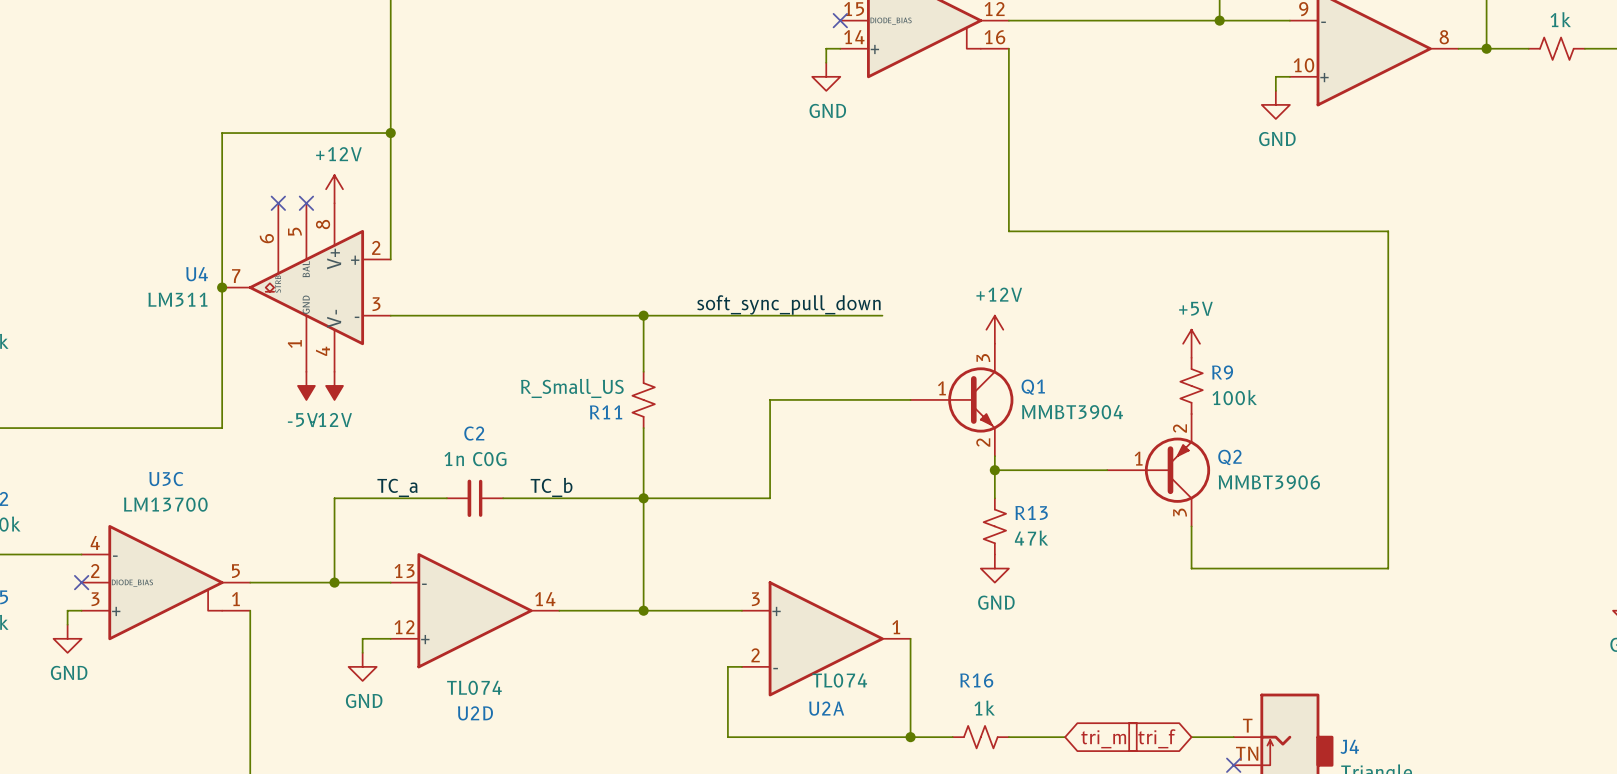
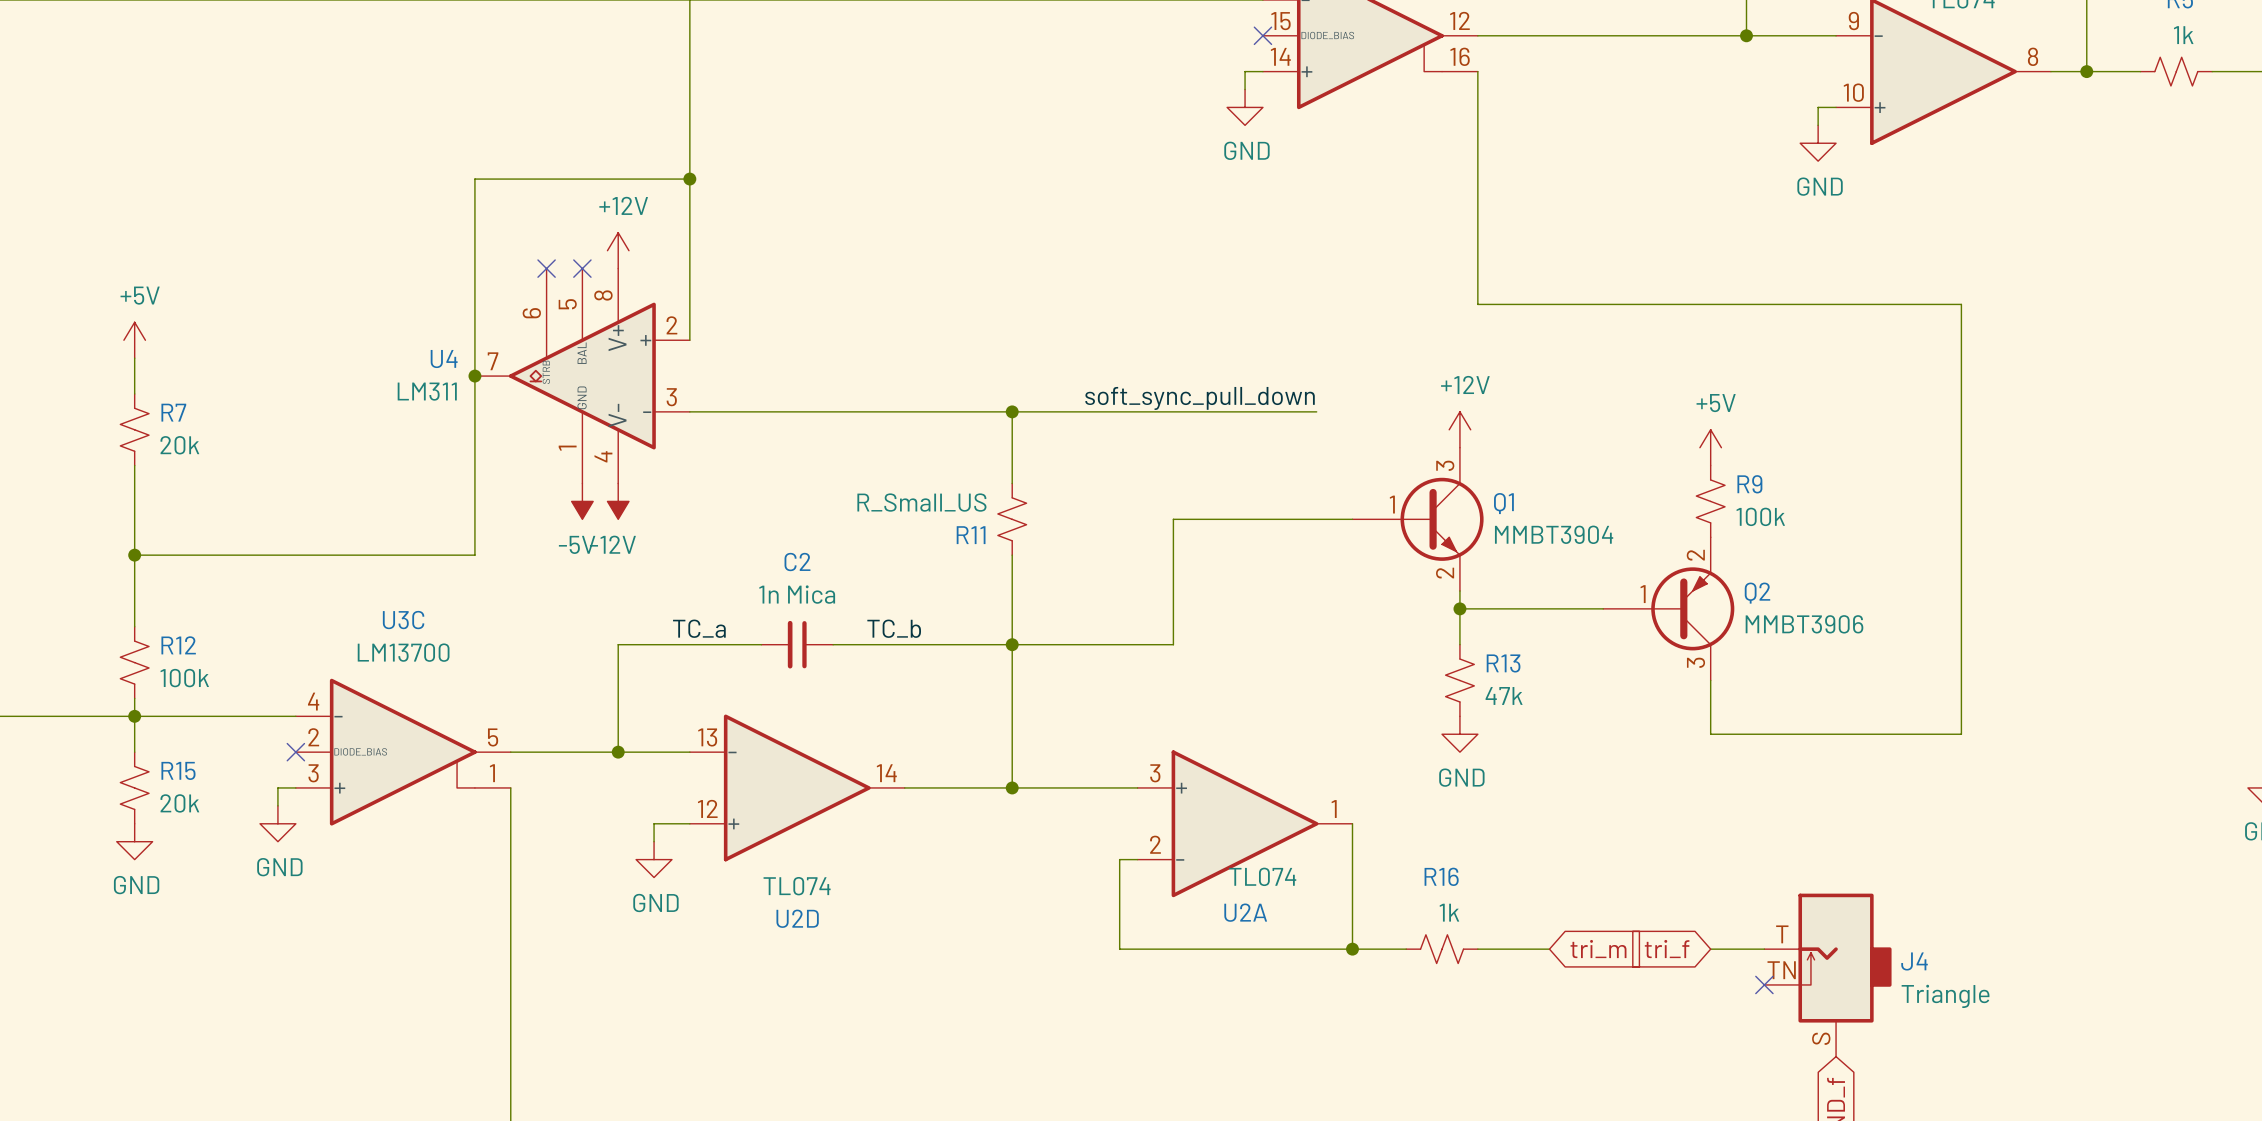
C2 value: 1n C0G (475, 459) -> 1n Mica (797, 594)

